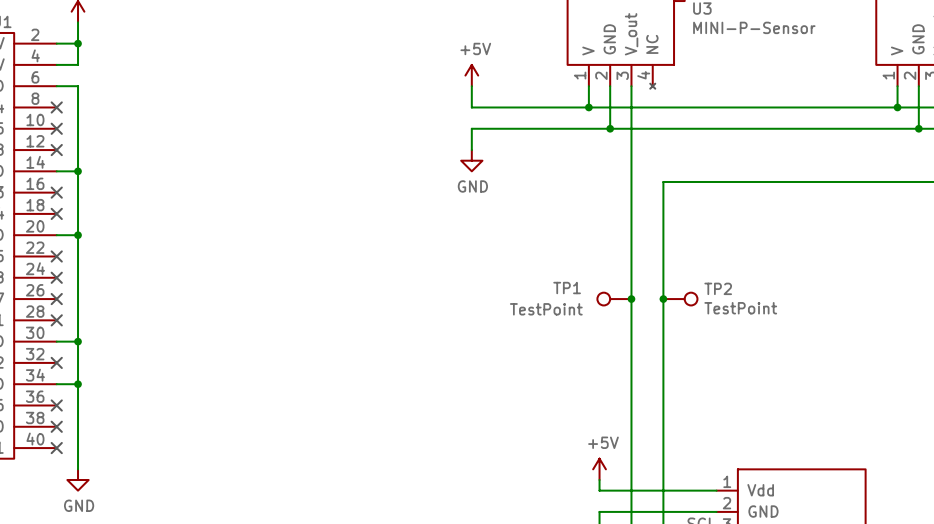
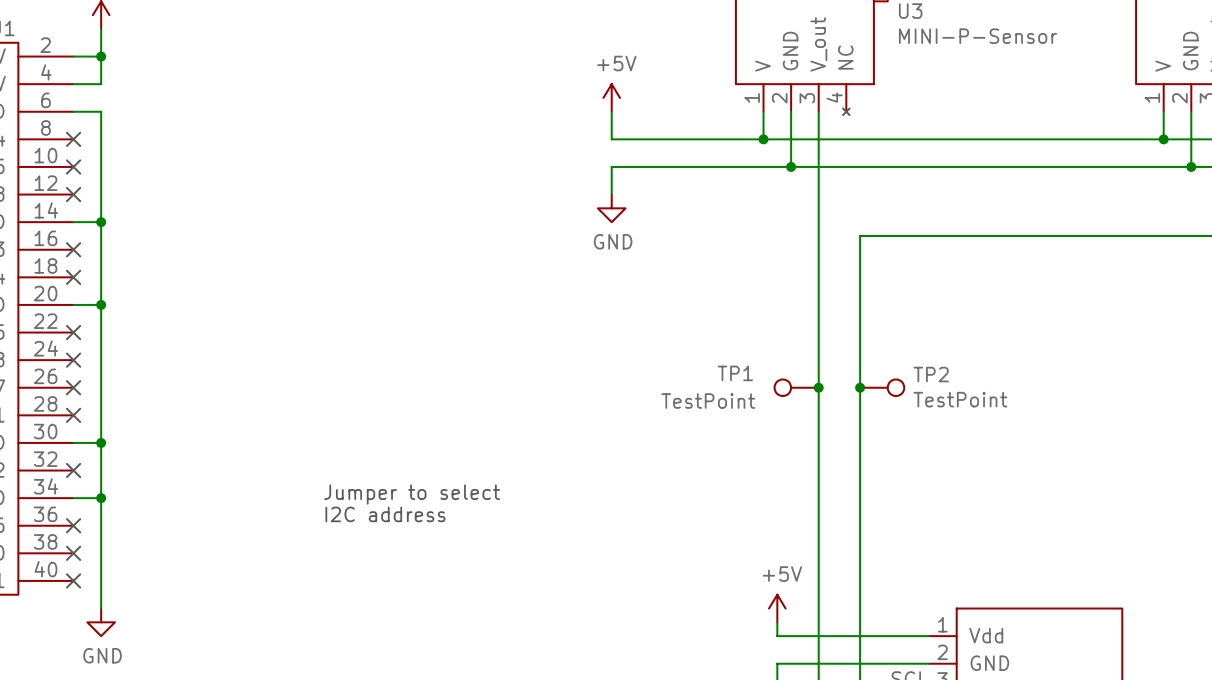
text: none -> Jumper to select (412, 494)
text: none -> I2C address (385, 514)

